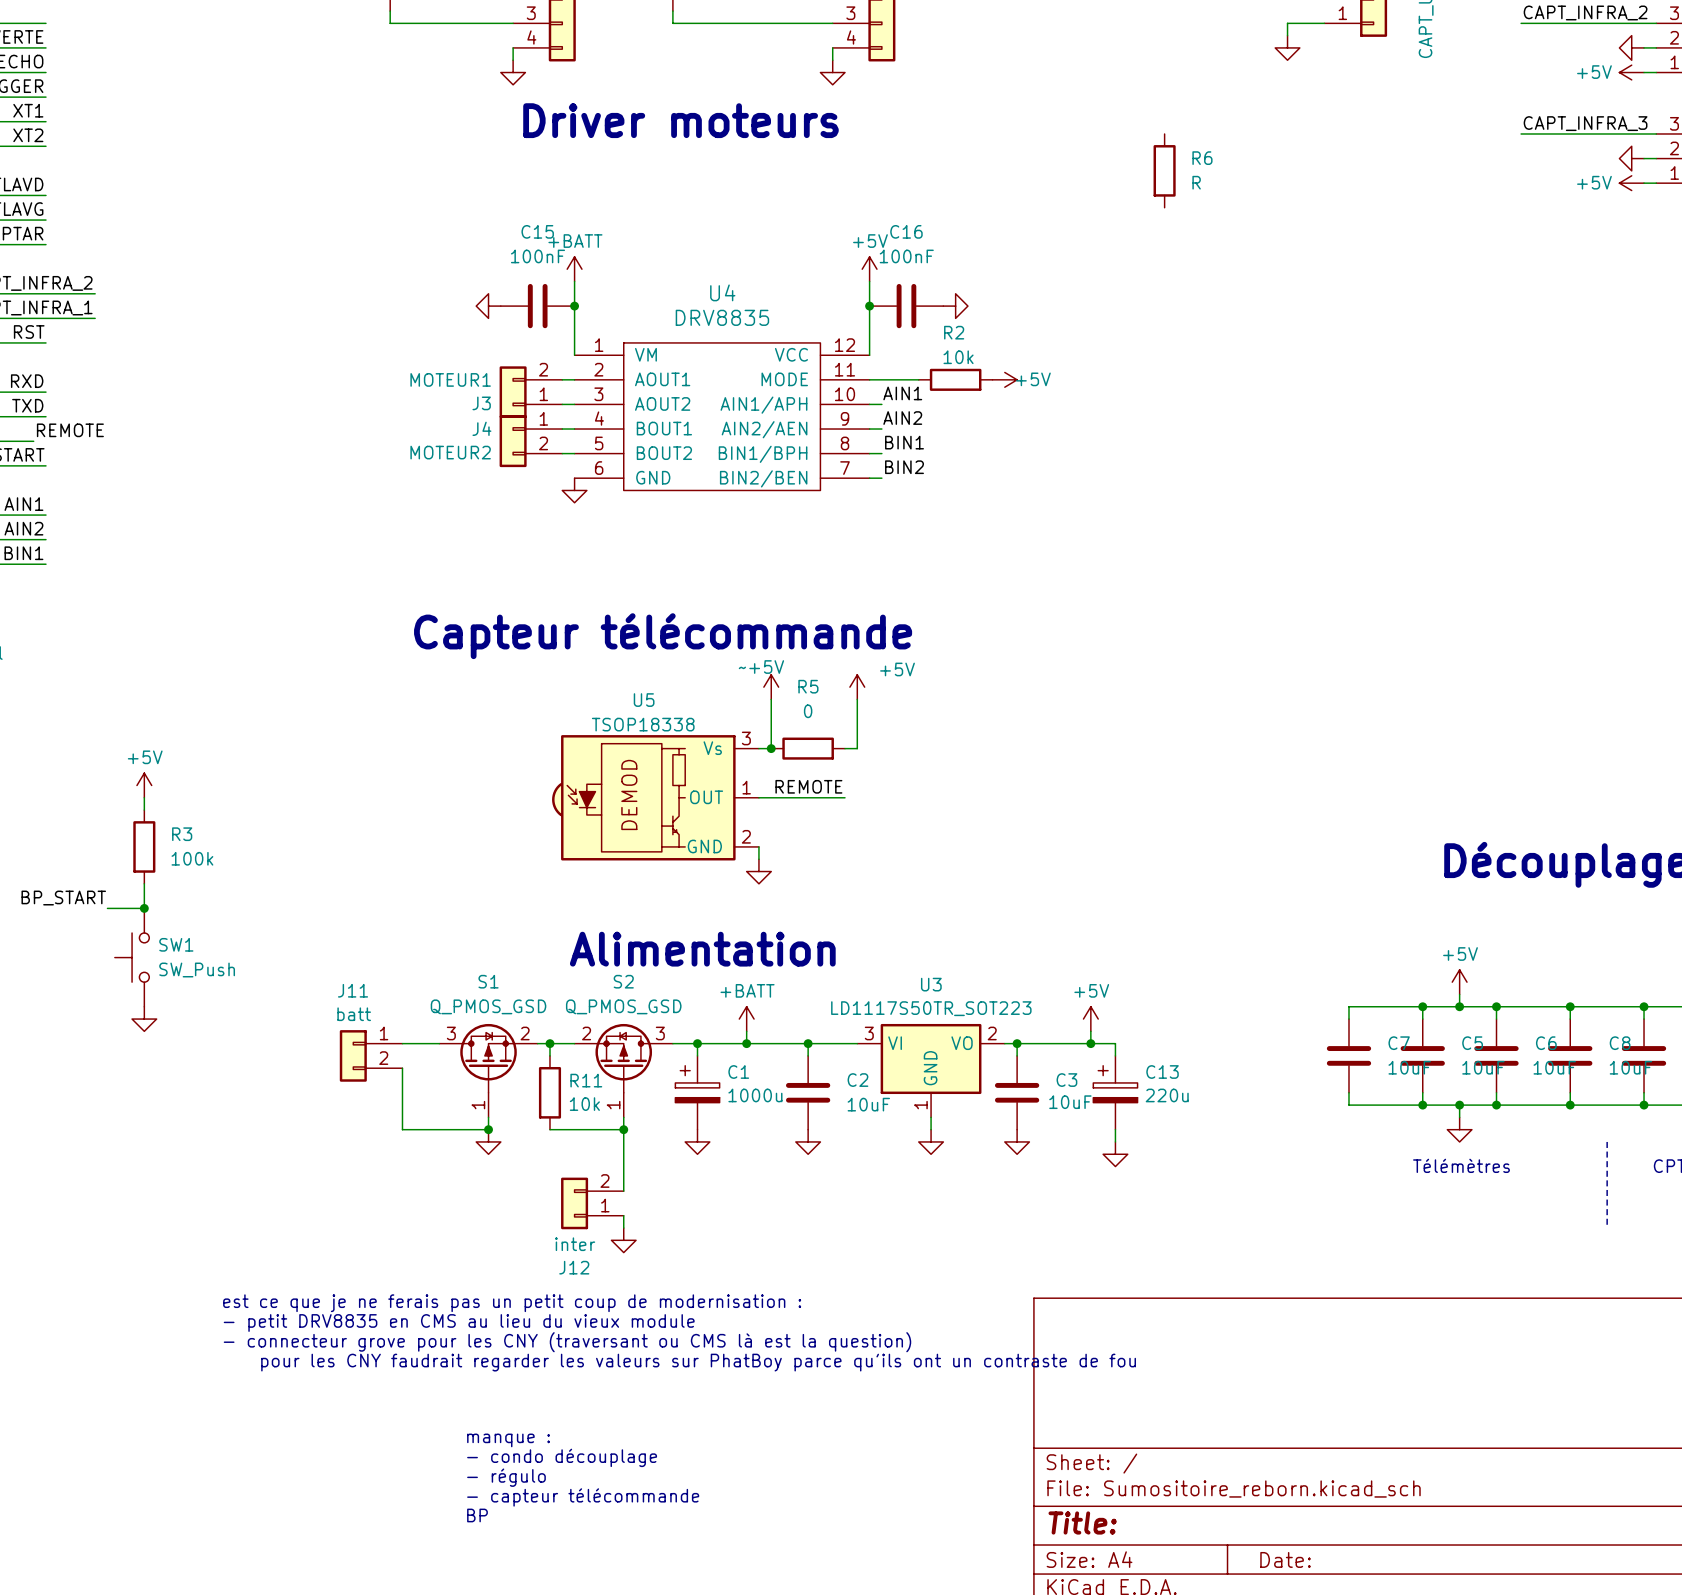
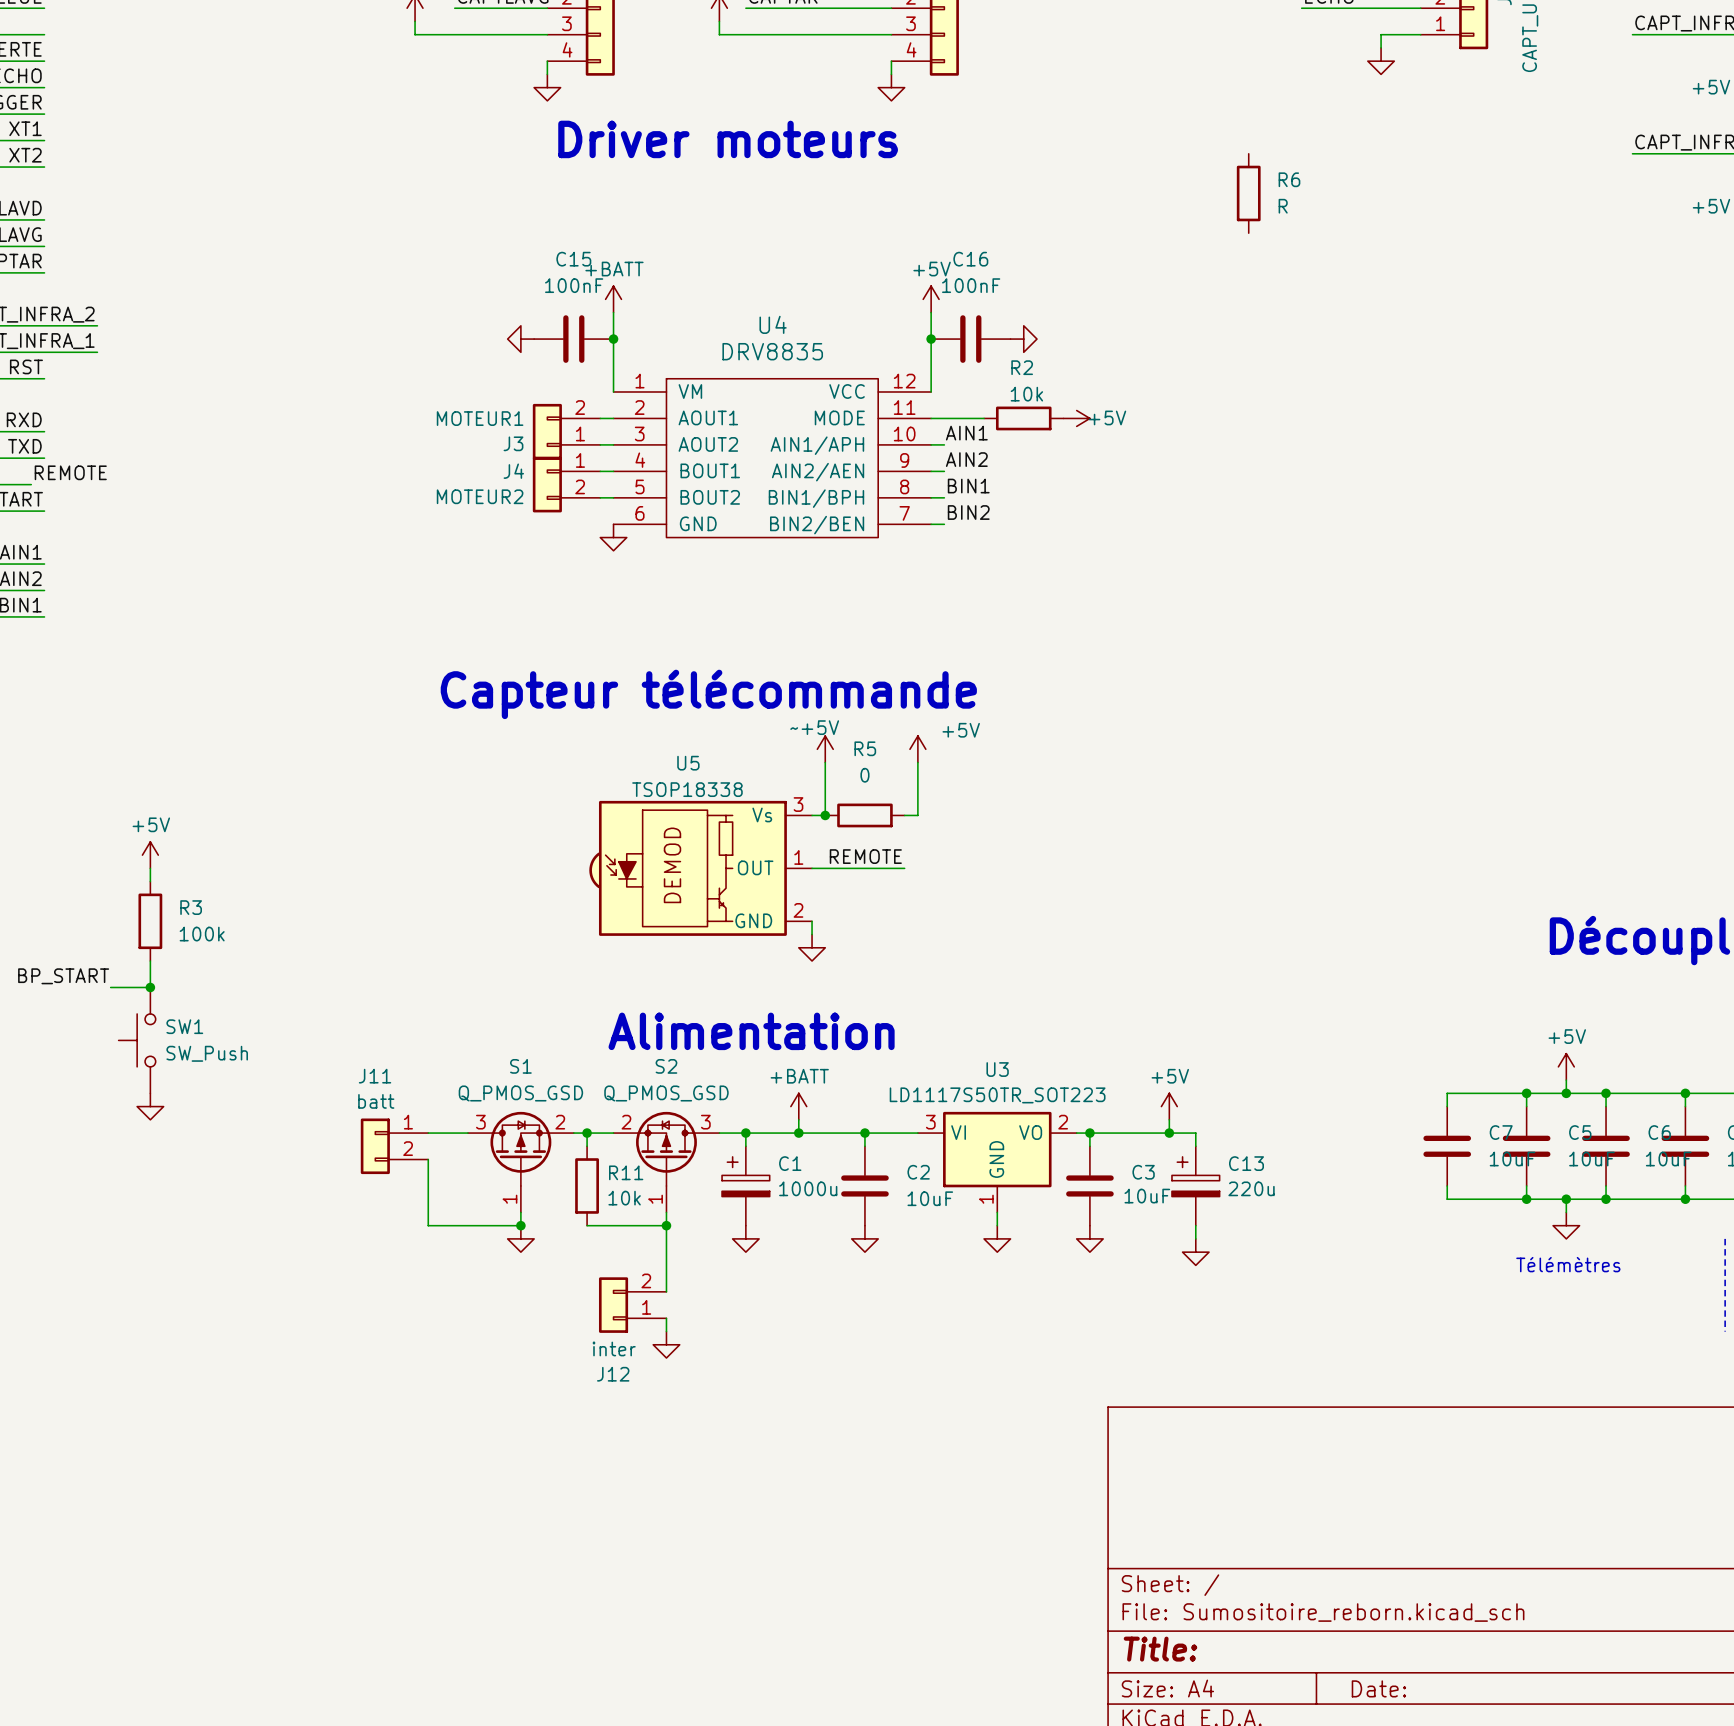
text: est ce que je ne ferais pas un petit coup de modernisation : (512, 1303) -> none
text: - petit DRV8835 en CMS au lieu du vieux module (459, 1323) -> none
text: - connecteur grove pour les CNY (traversant ou CMS là est la question) (567, 1342) -> none
text: pour les CNY faudrait regarder les valeurs sur PhatBoy parce qu'ils ont un contraste de fou (698, 1362) -> none
text: manque : (508, 1440) -> none
text: - condo découplage (562, 1457) -> none
text: - régulo (506, 1477) -> none
text: - capteur télécommande (583, 1497) -> none
text: BP (477, 1515) -> none

